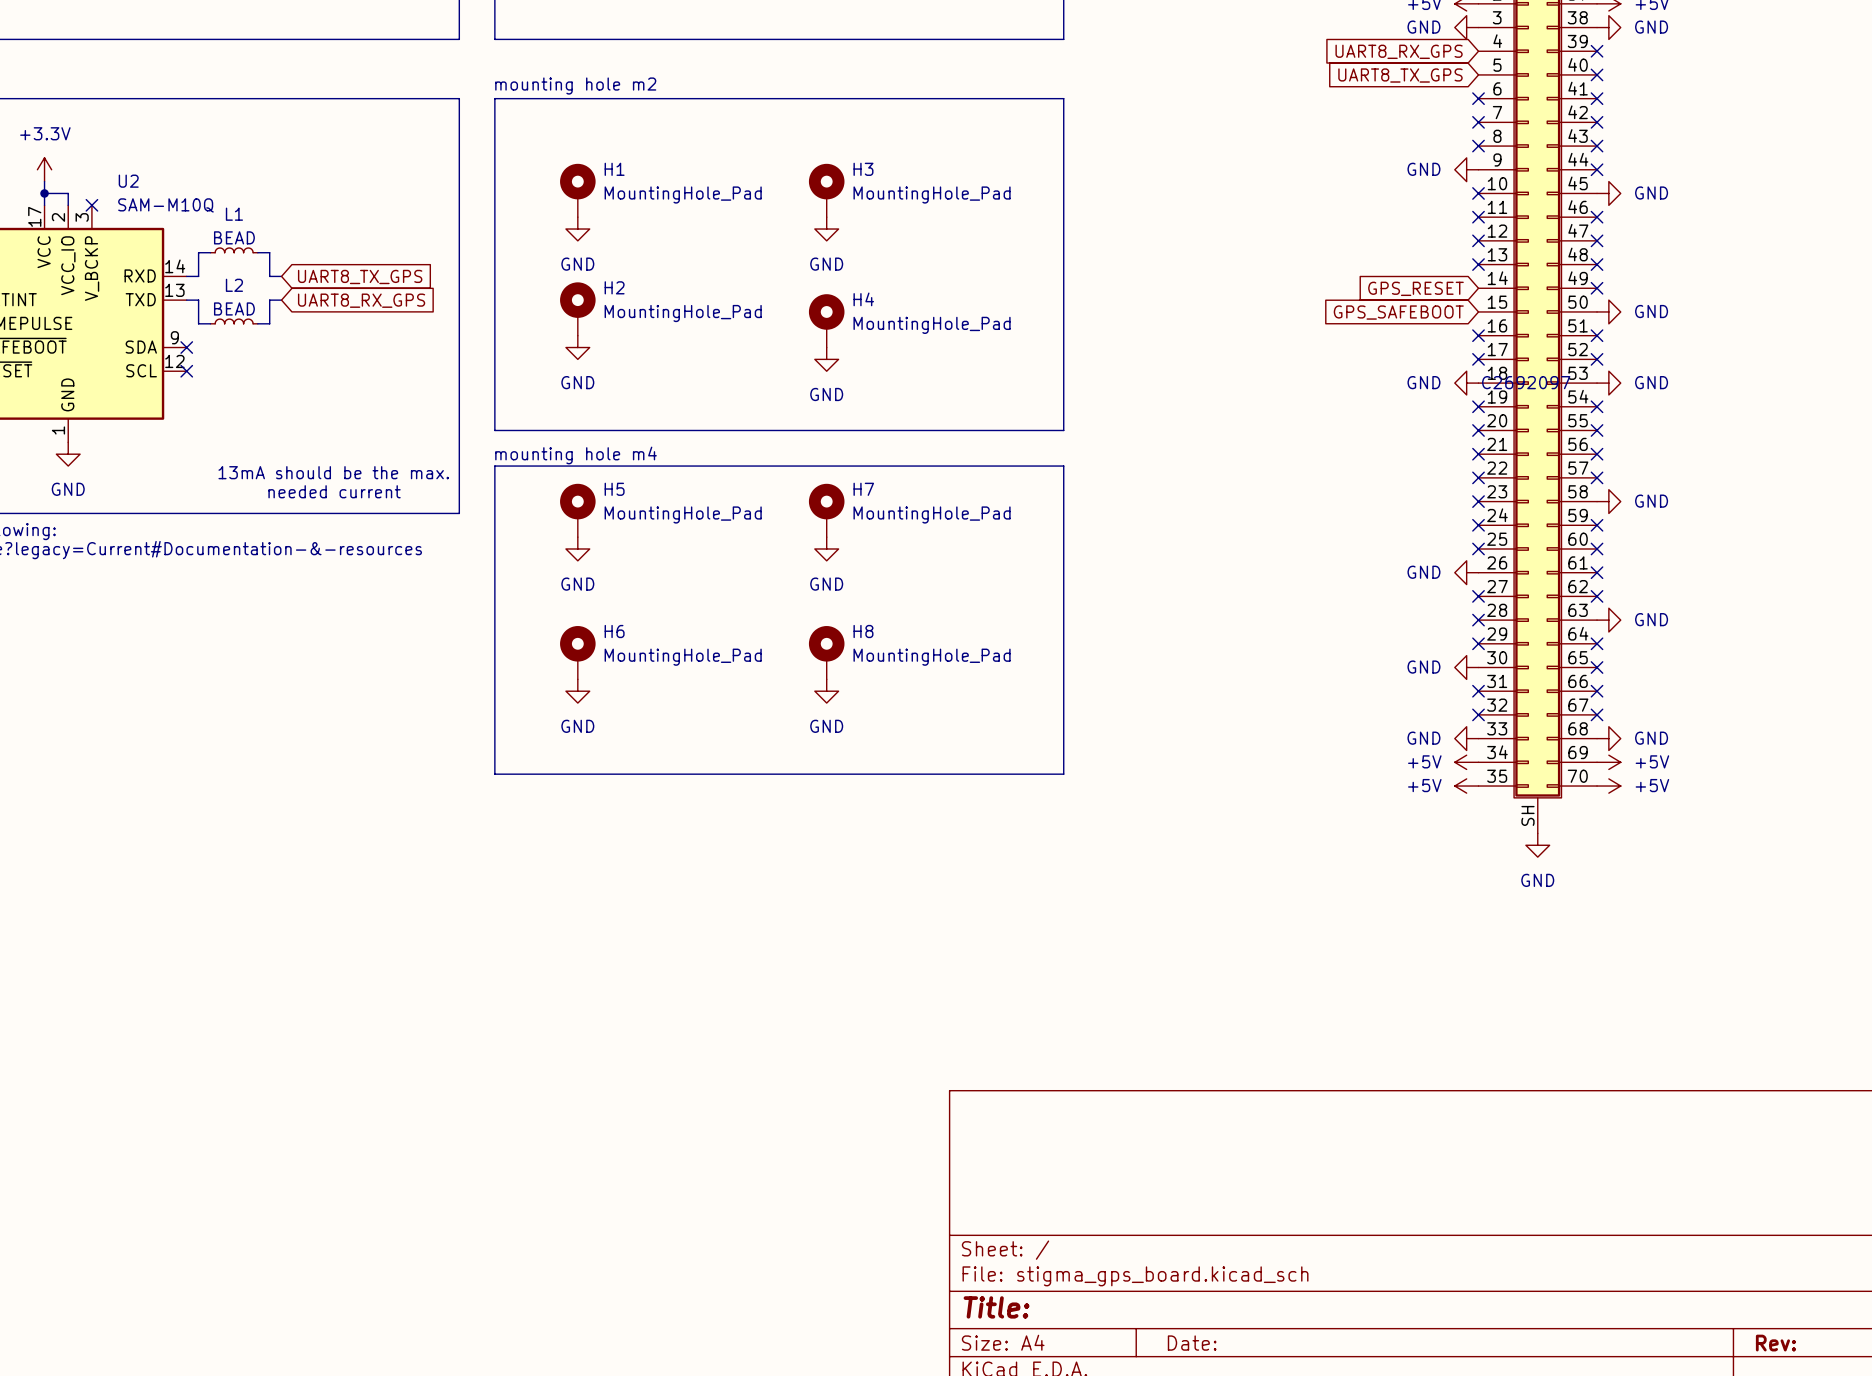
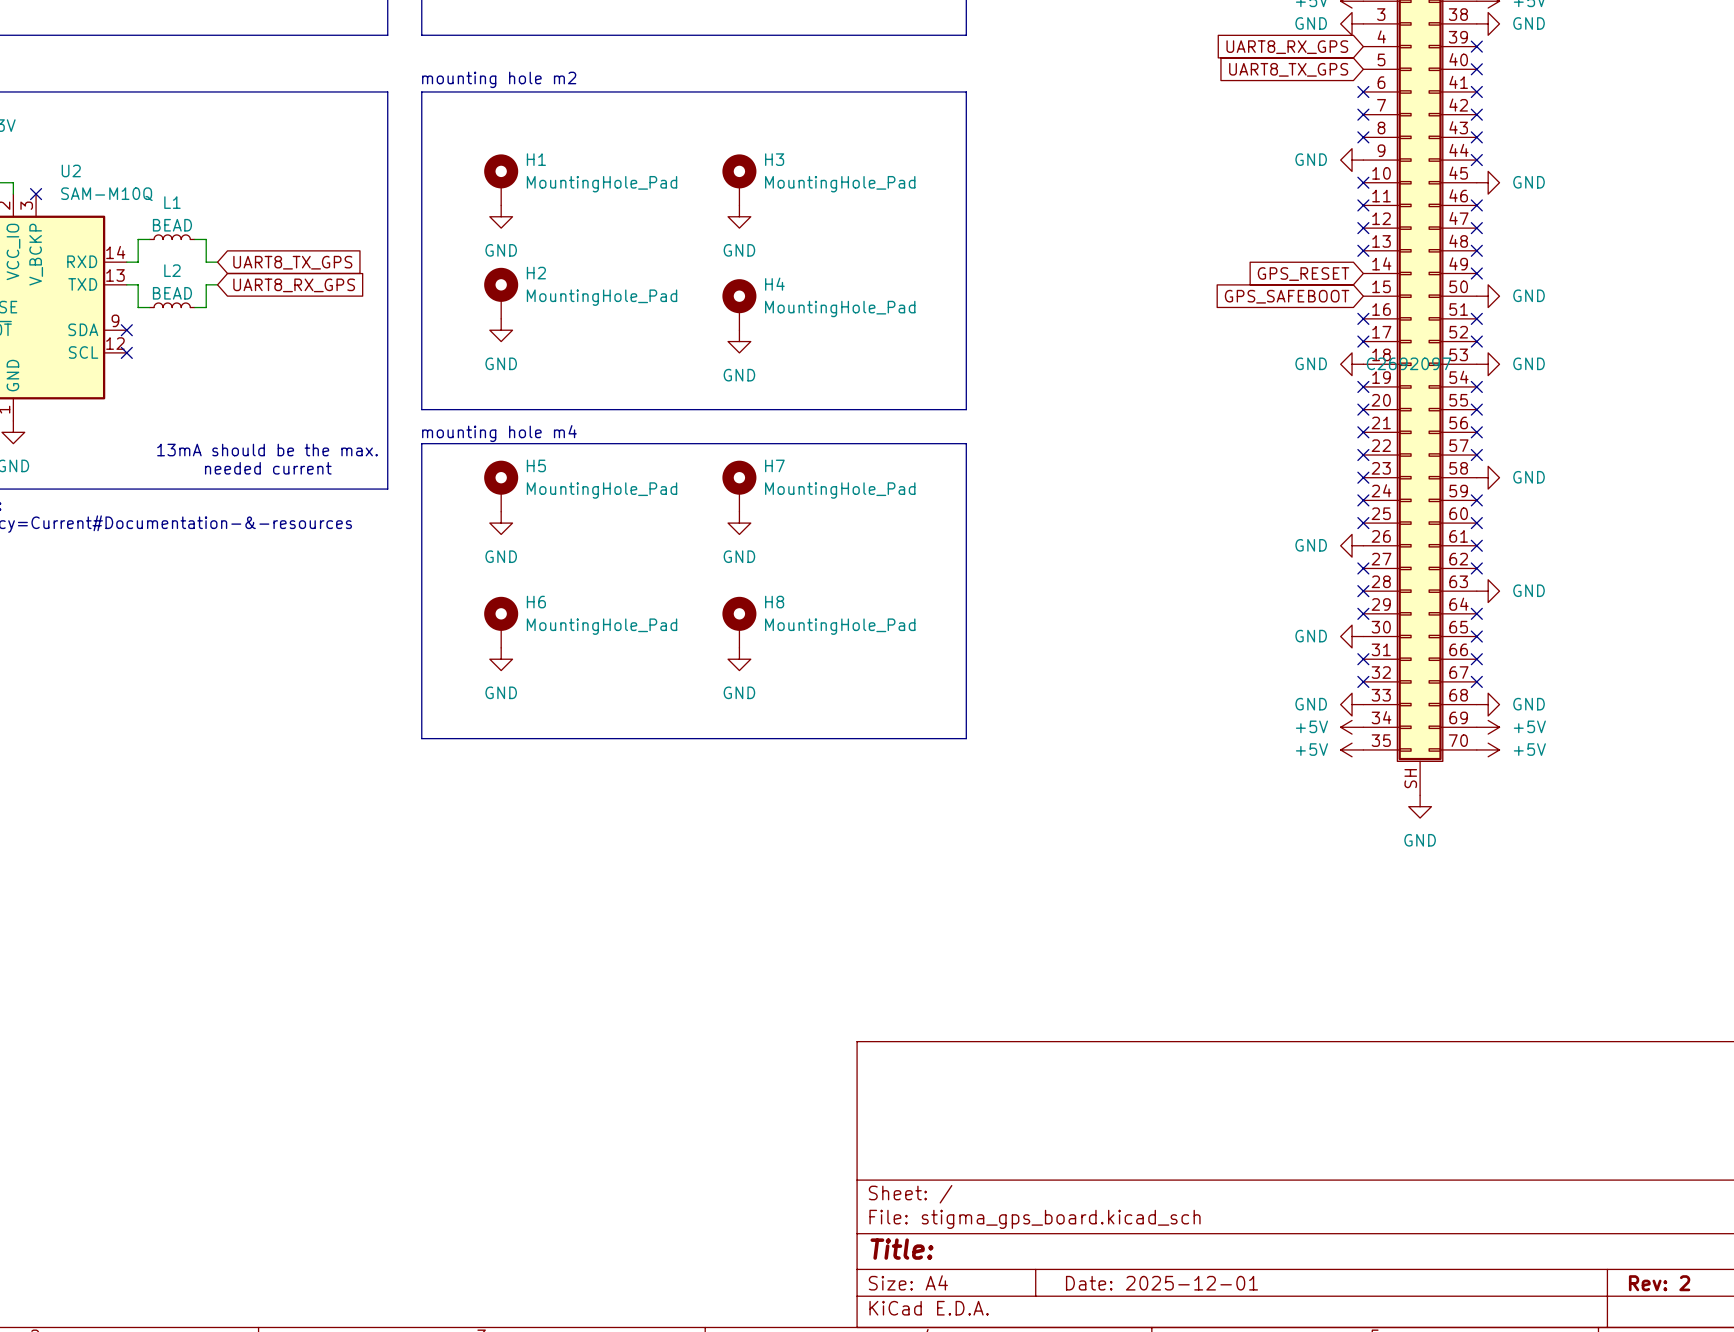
title block: Date: (1192, 1343) -> Date: 2025-12-01 (1161, 1283)
title block: Rev: (1775, 1343) -> Rev: 2 (1659, 1283)

